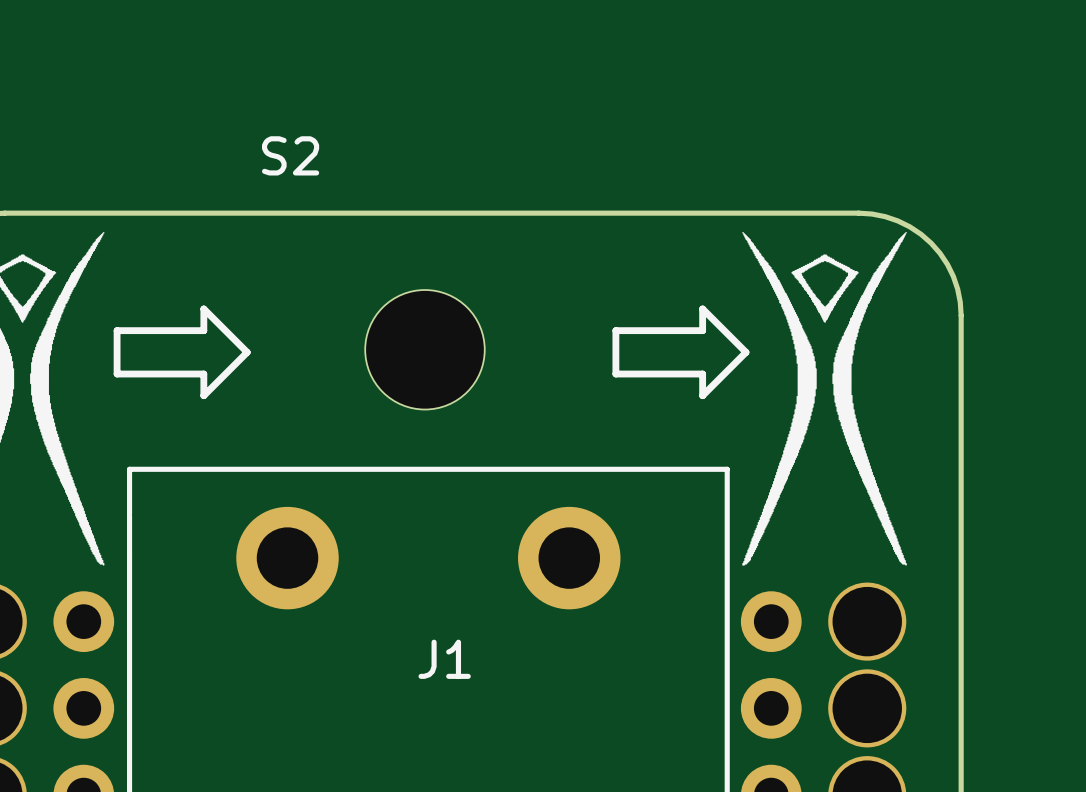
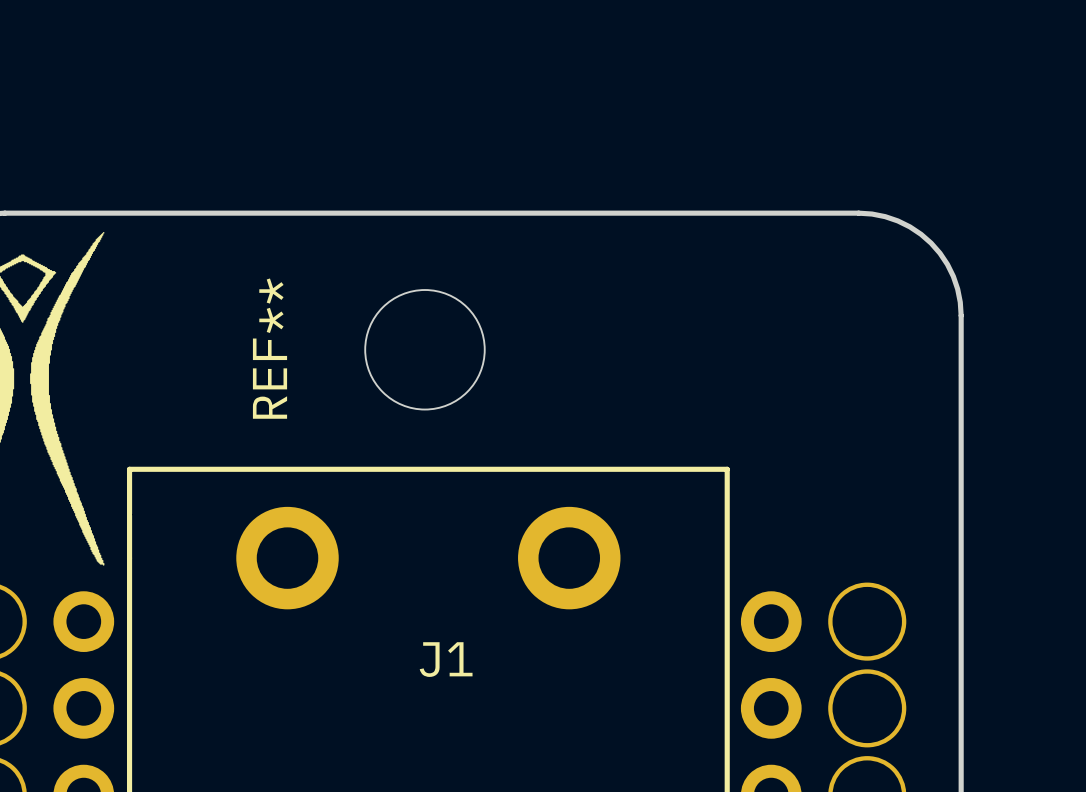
S2 name: S2 (290, 155) -> REF** (270, 348)
drawing: [742, 232, 907, 566] -> none
line: (203, 308) (203, 330) (117, 330) (117, 374) (203, 374) (203, 395) (247, 352) (203, 308) -> none
line: (702, 308) (702, 330) (615, 330) (615, 374) (702, 374) (702, 395) (746, 352) (702, 308) -> none

